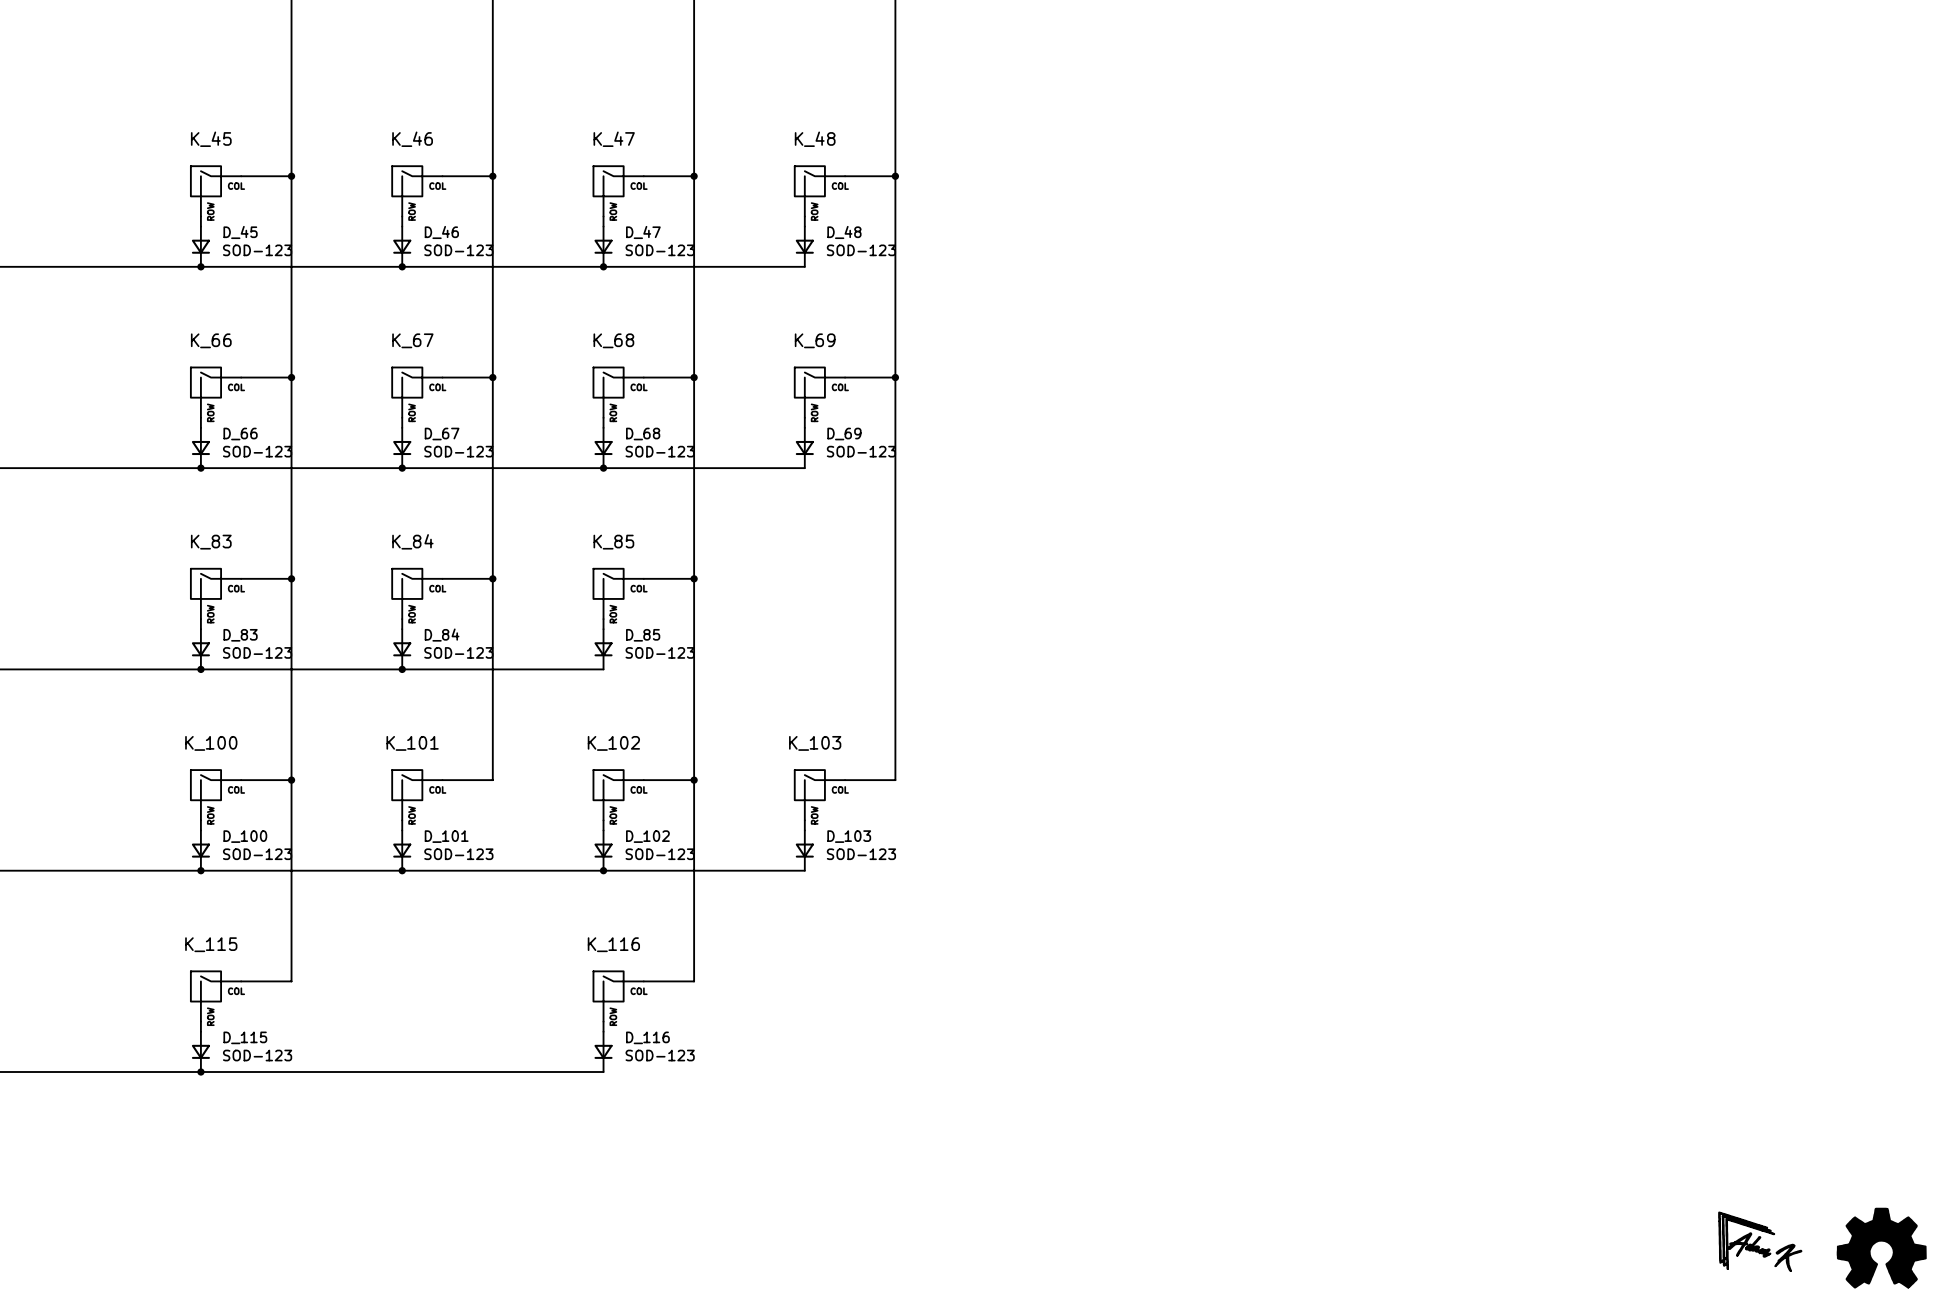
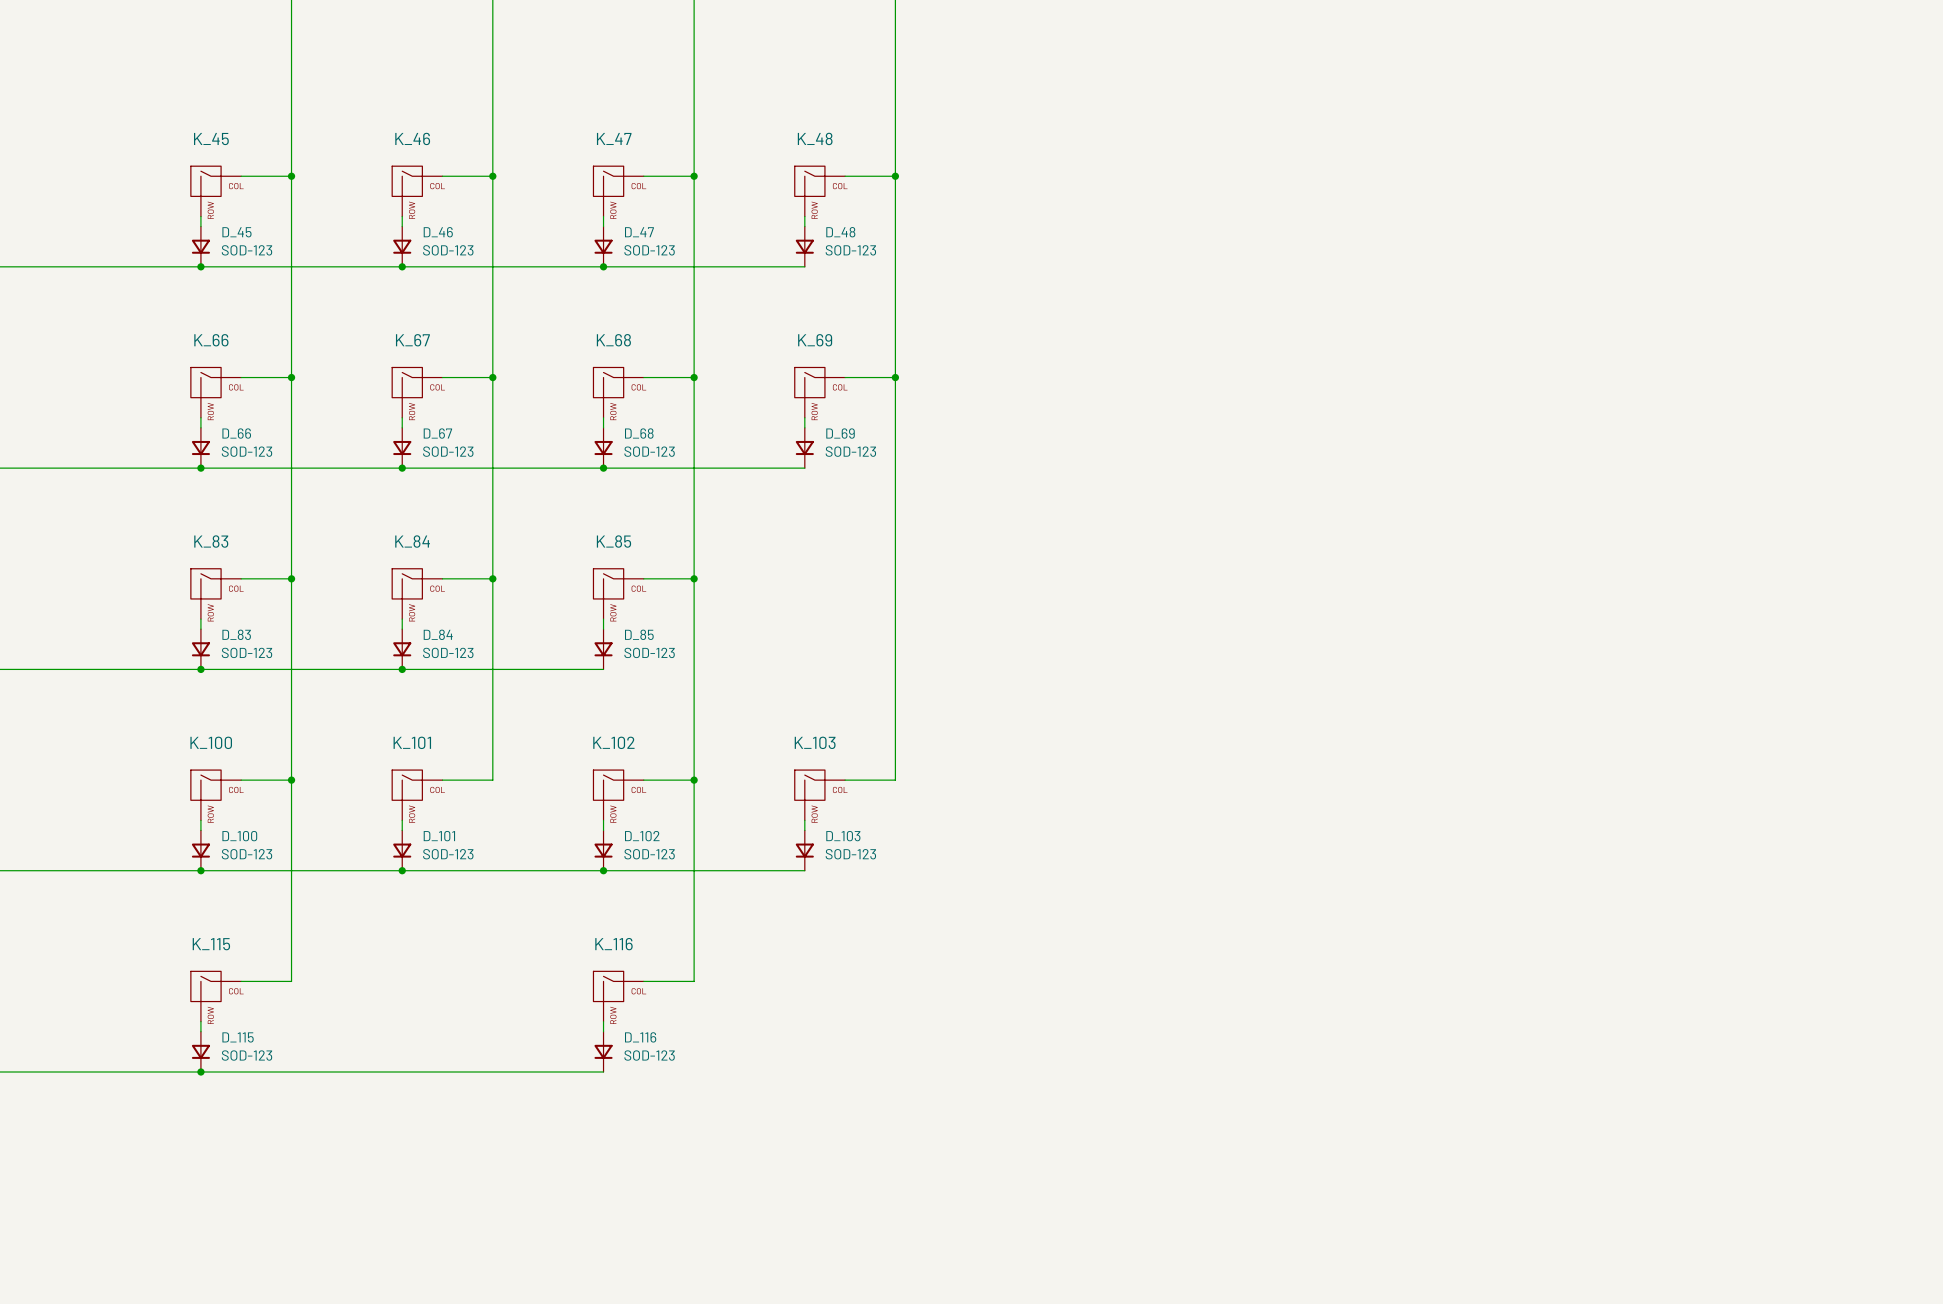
power symbol: (1760, 1241) -> none
power symbol: (1881, 1248) -> none

